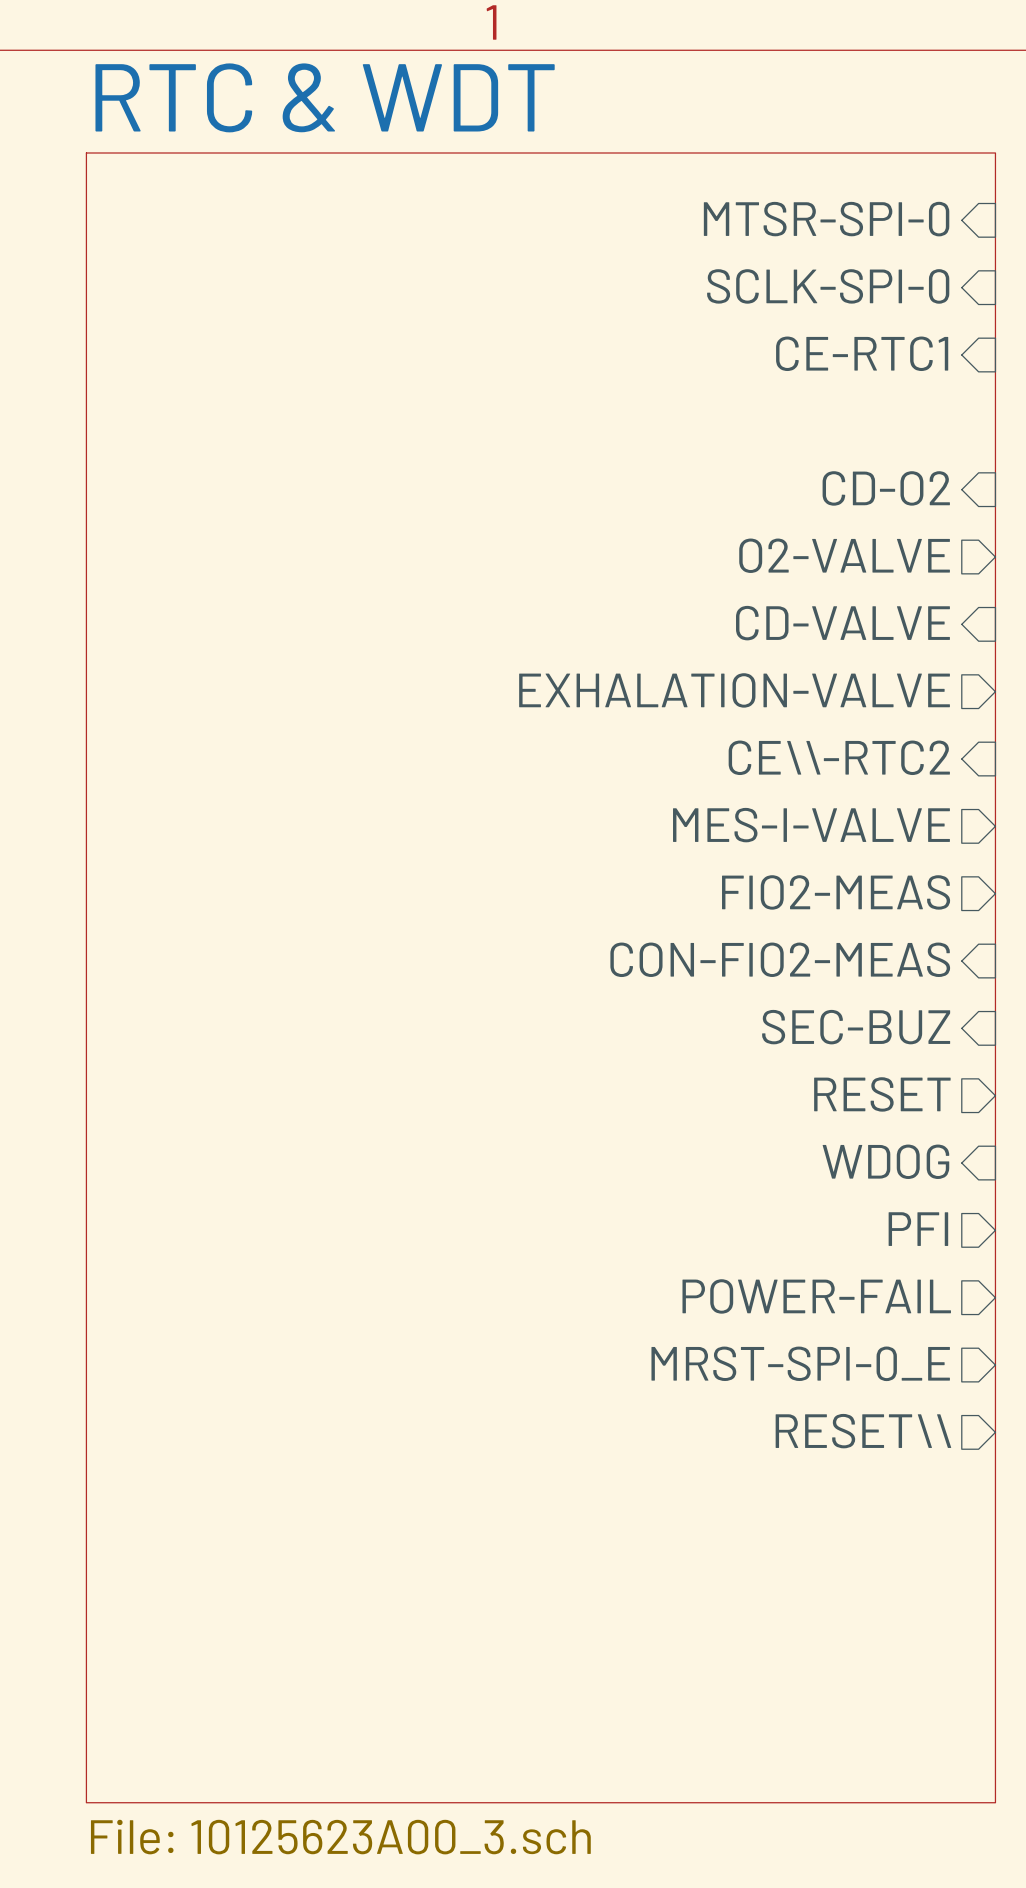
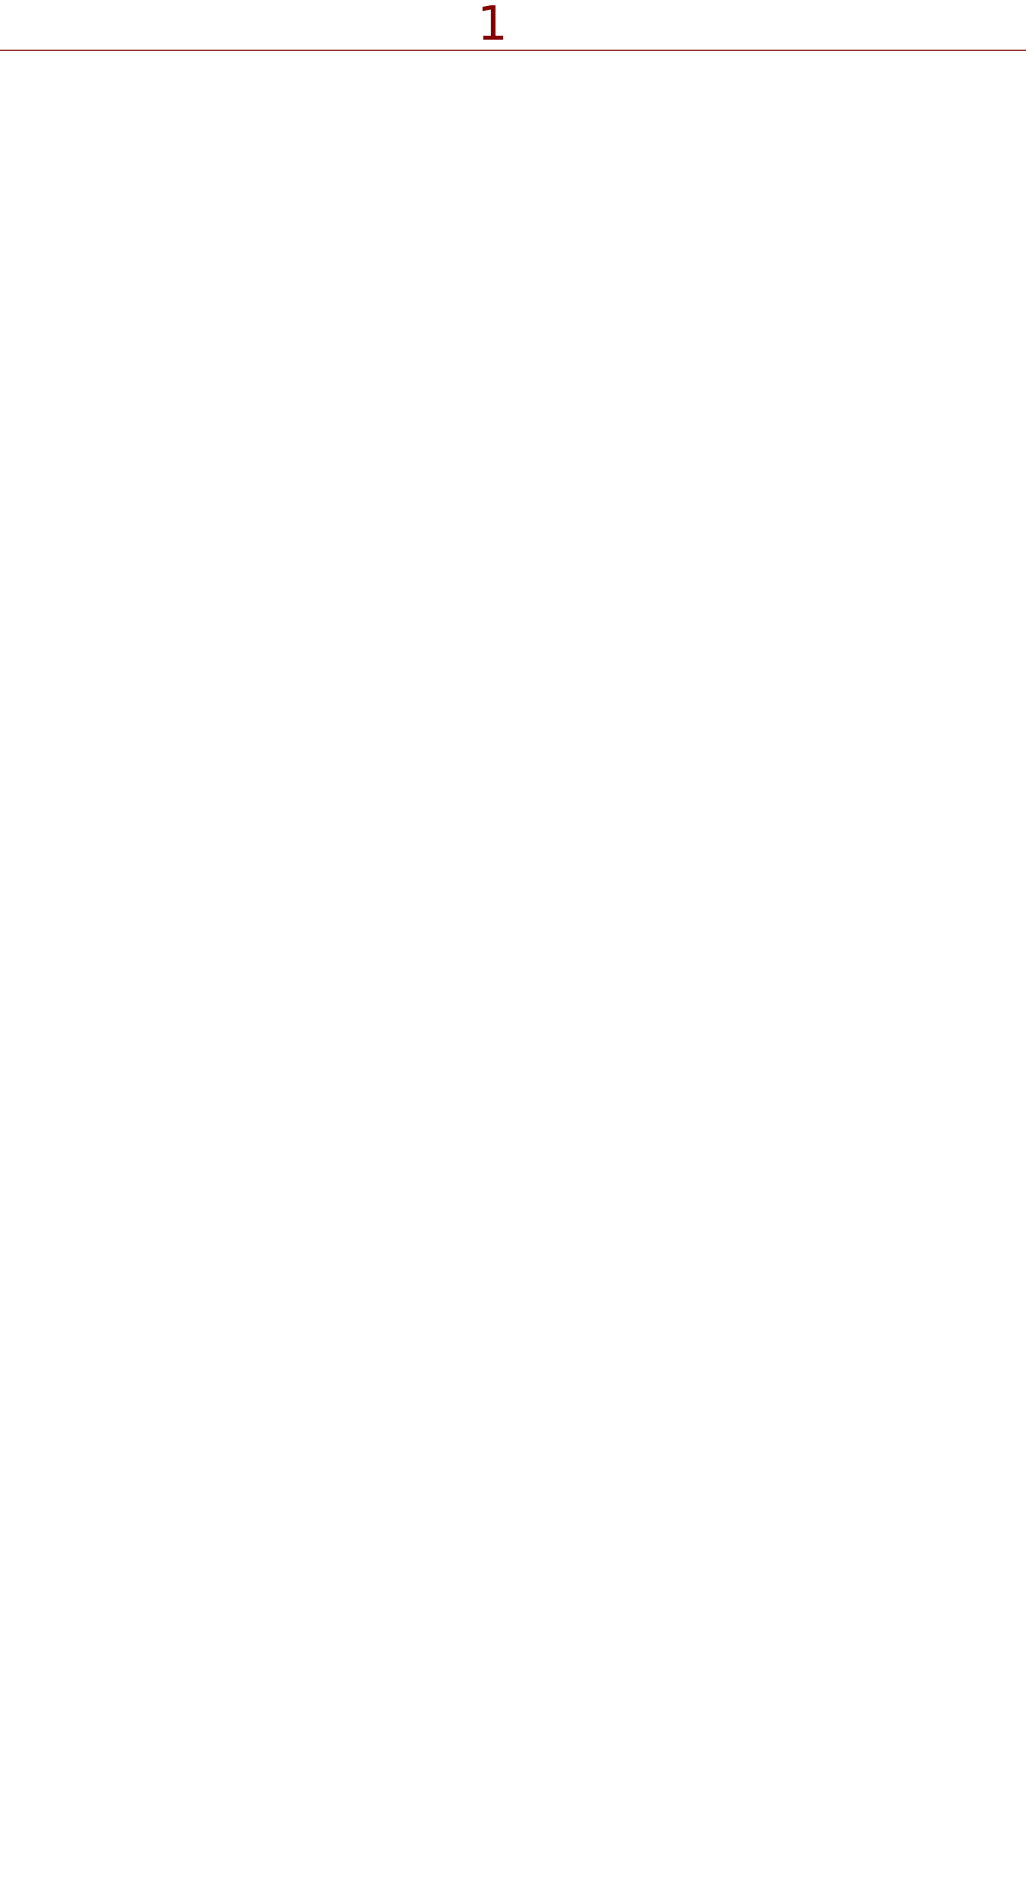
sheet pin: MTSR-SPI-0 (826, 219) -> none
sheet pin: SCLK-SPI-0 (828, 286) -> none
sheet pin: CE-RTC1 (862, 353) -> none
sheet pin: CD-O2 (886, 488) -> none
sheet pin: O2-VALVE (844, 555) -> none
sheet pin: CD-VALVE (842, 623) -> none
sheet pin: EXHALATION-VALVE (734, 690) -> none
sheet pin: CE\\-RTC2 (839, 757) -> none
sheet pin: MES-I-VALVE (811, 825) -> none
sheet pin: FIO2-MEAS (836, 892) -> none
sheet pin: CON-FIO2-MEAS (780, 959) -> none
sheet RTC & WDT: File: 10125623A00_3.sch (540, 977) -> none
sheet pin: SEC-BUZ (856, 1027) -> none
sheet pin: RESET (882, 1094) -> none
sheet pin: WDOG (885, 1161) -> none
sheet pin: PFI (918, 1229) -> none
sheet pin: POWER-FAIL (816, 1296) -> none
sheet pin: MRST-SPI-0_E (800, 1363) -> none
sheet pin: RESET\\ (863, 1431) -> none

